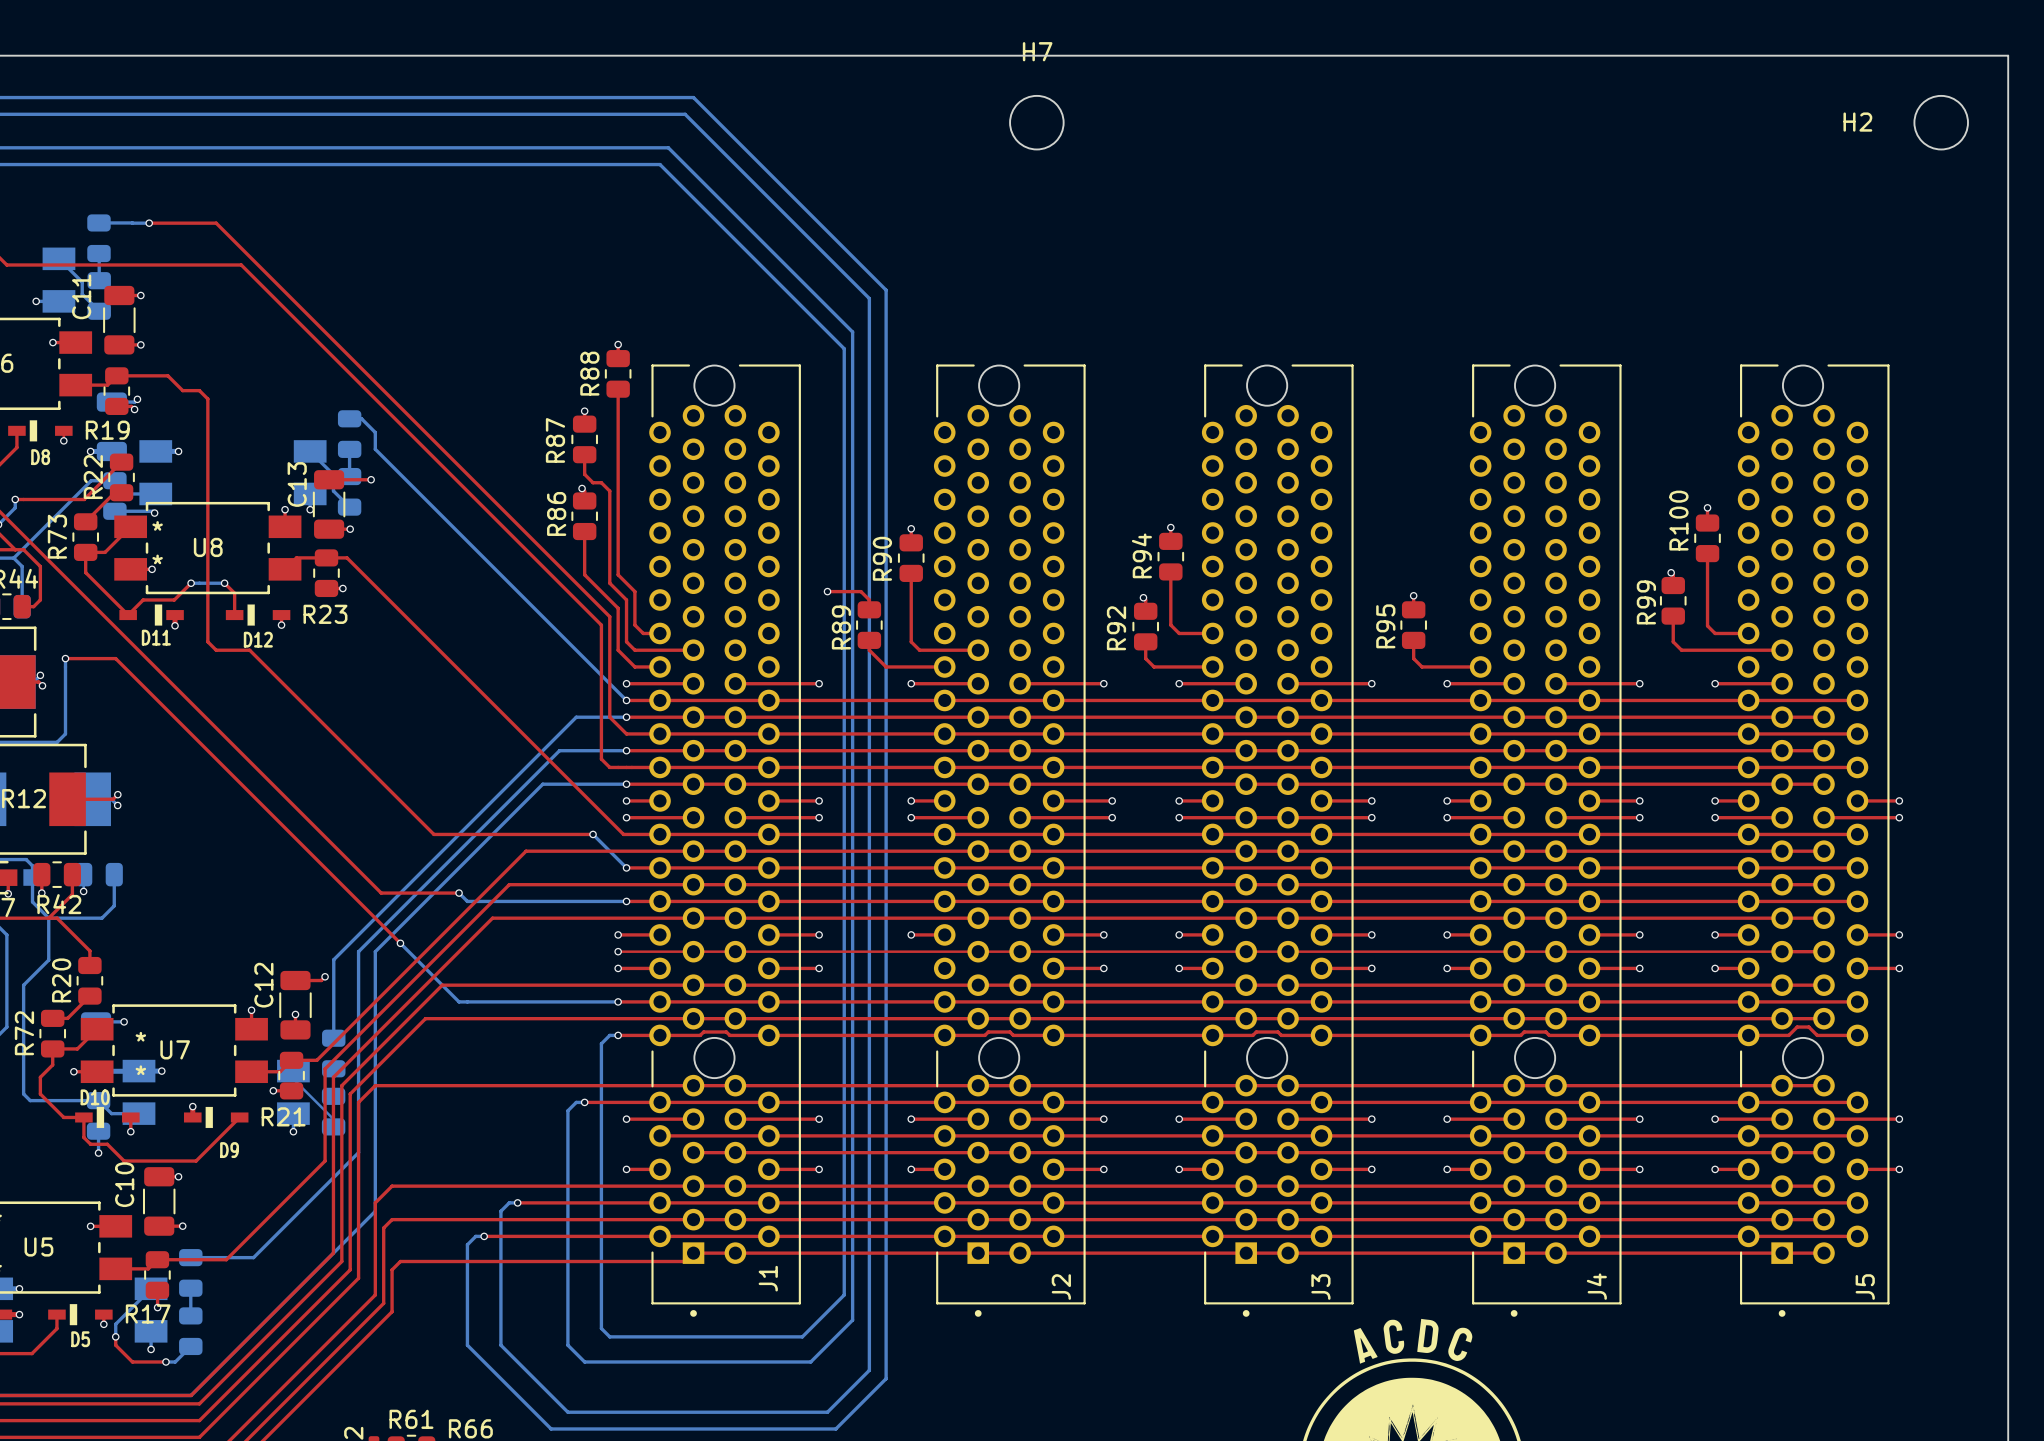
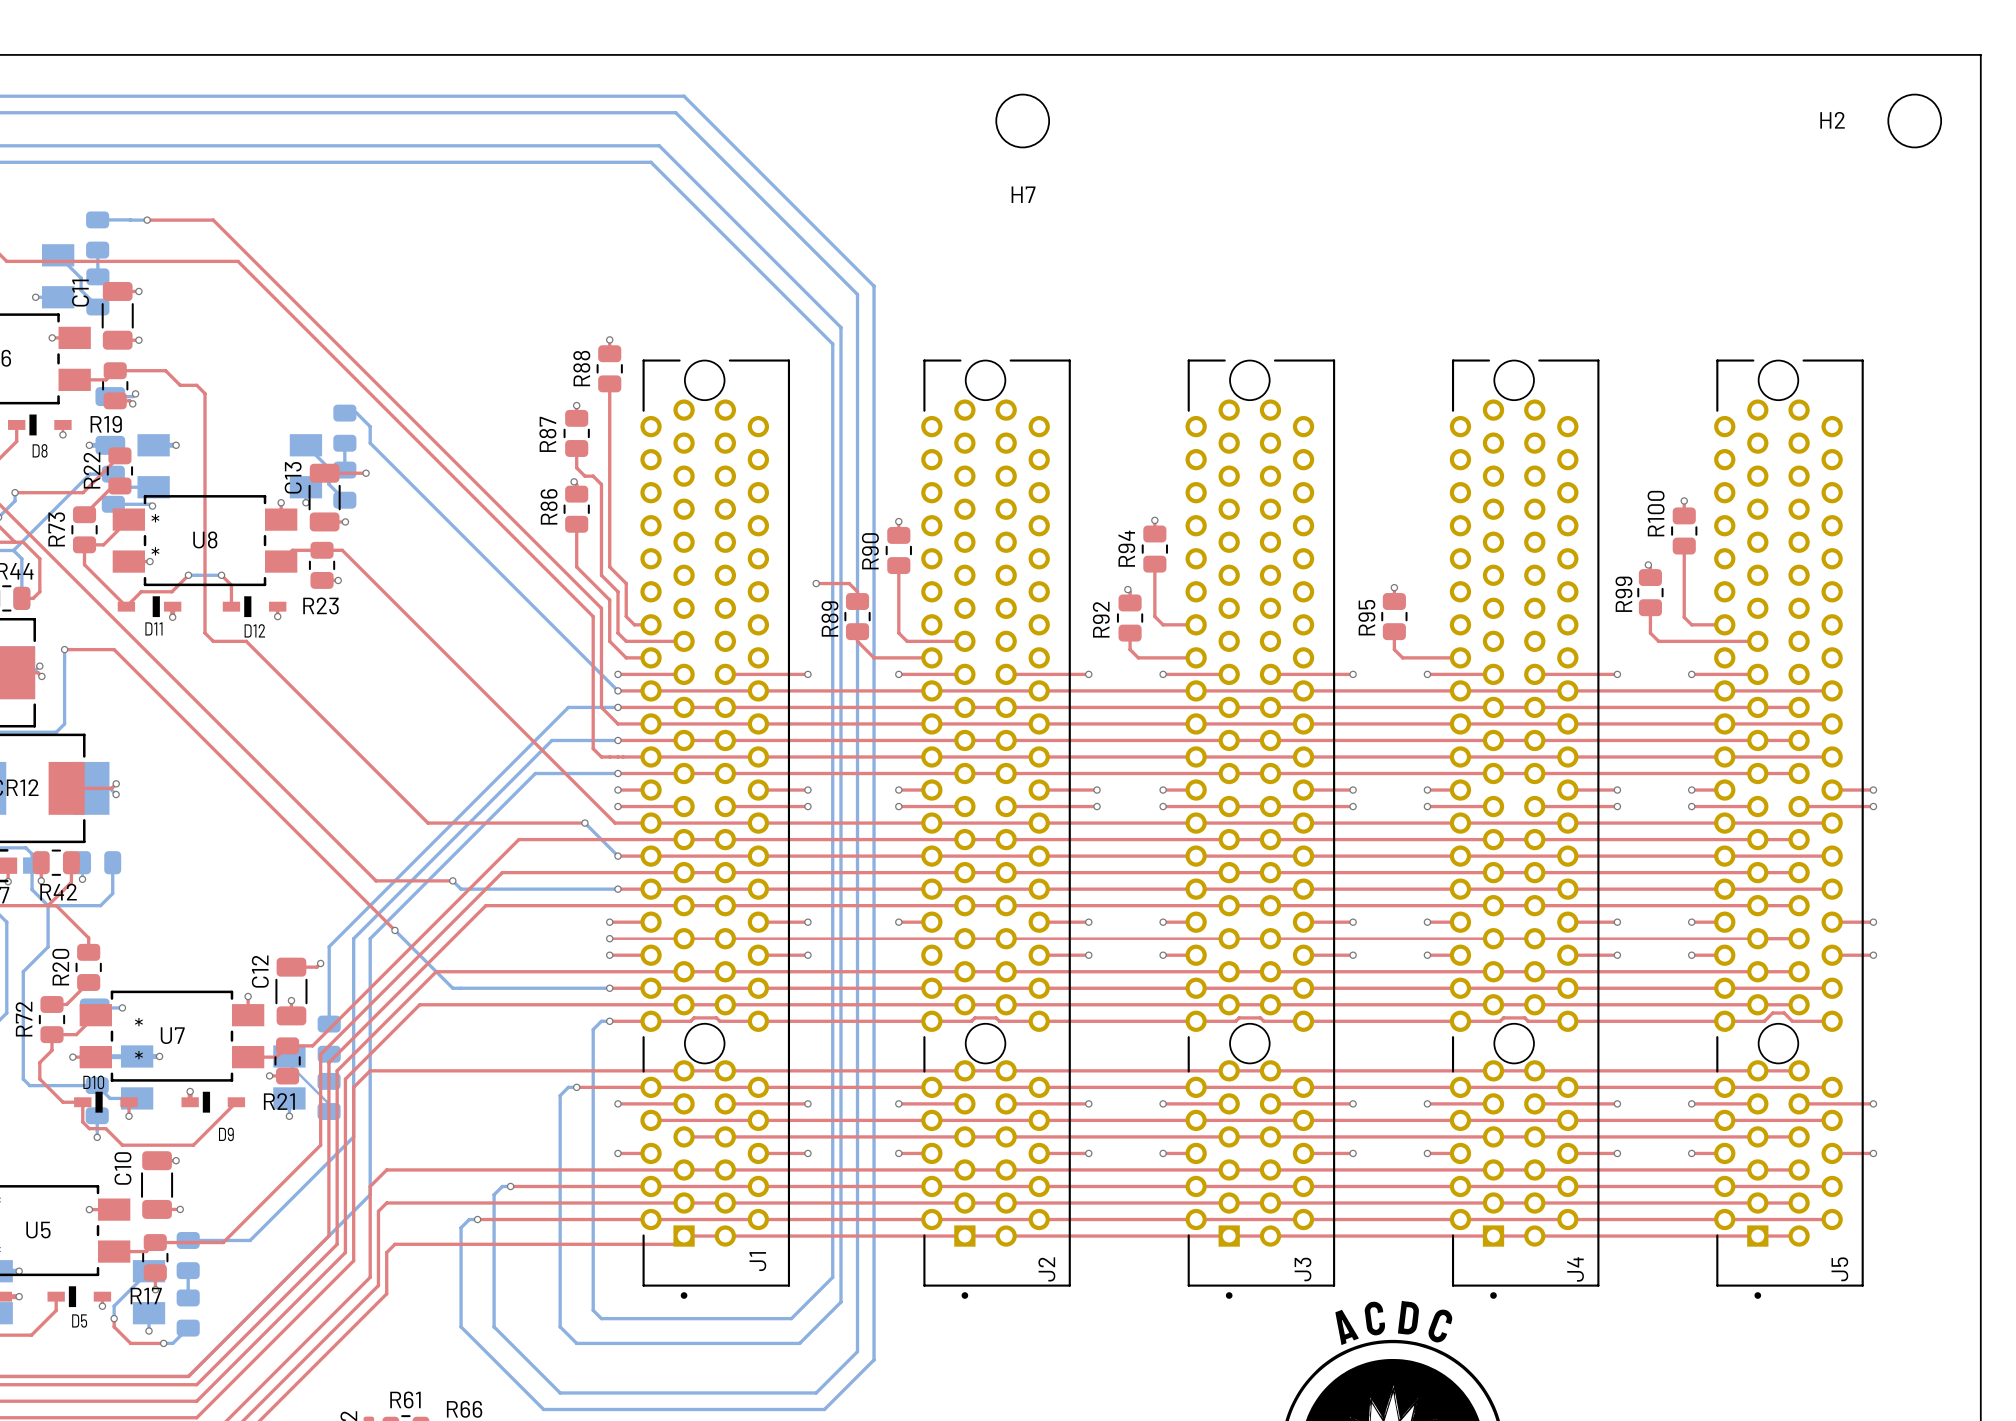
H7 name position: H7 (1037, 51) -> H7 (1023, 194)

